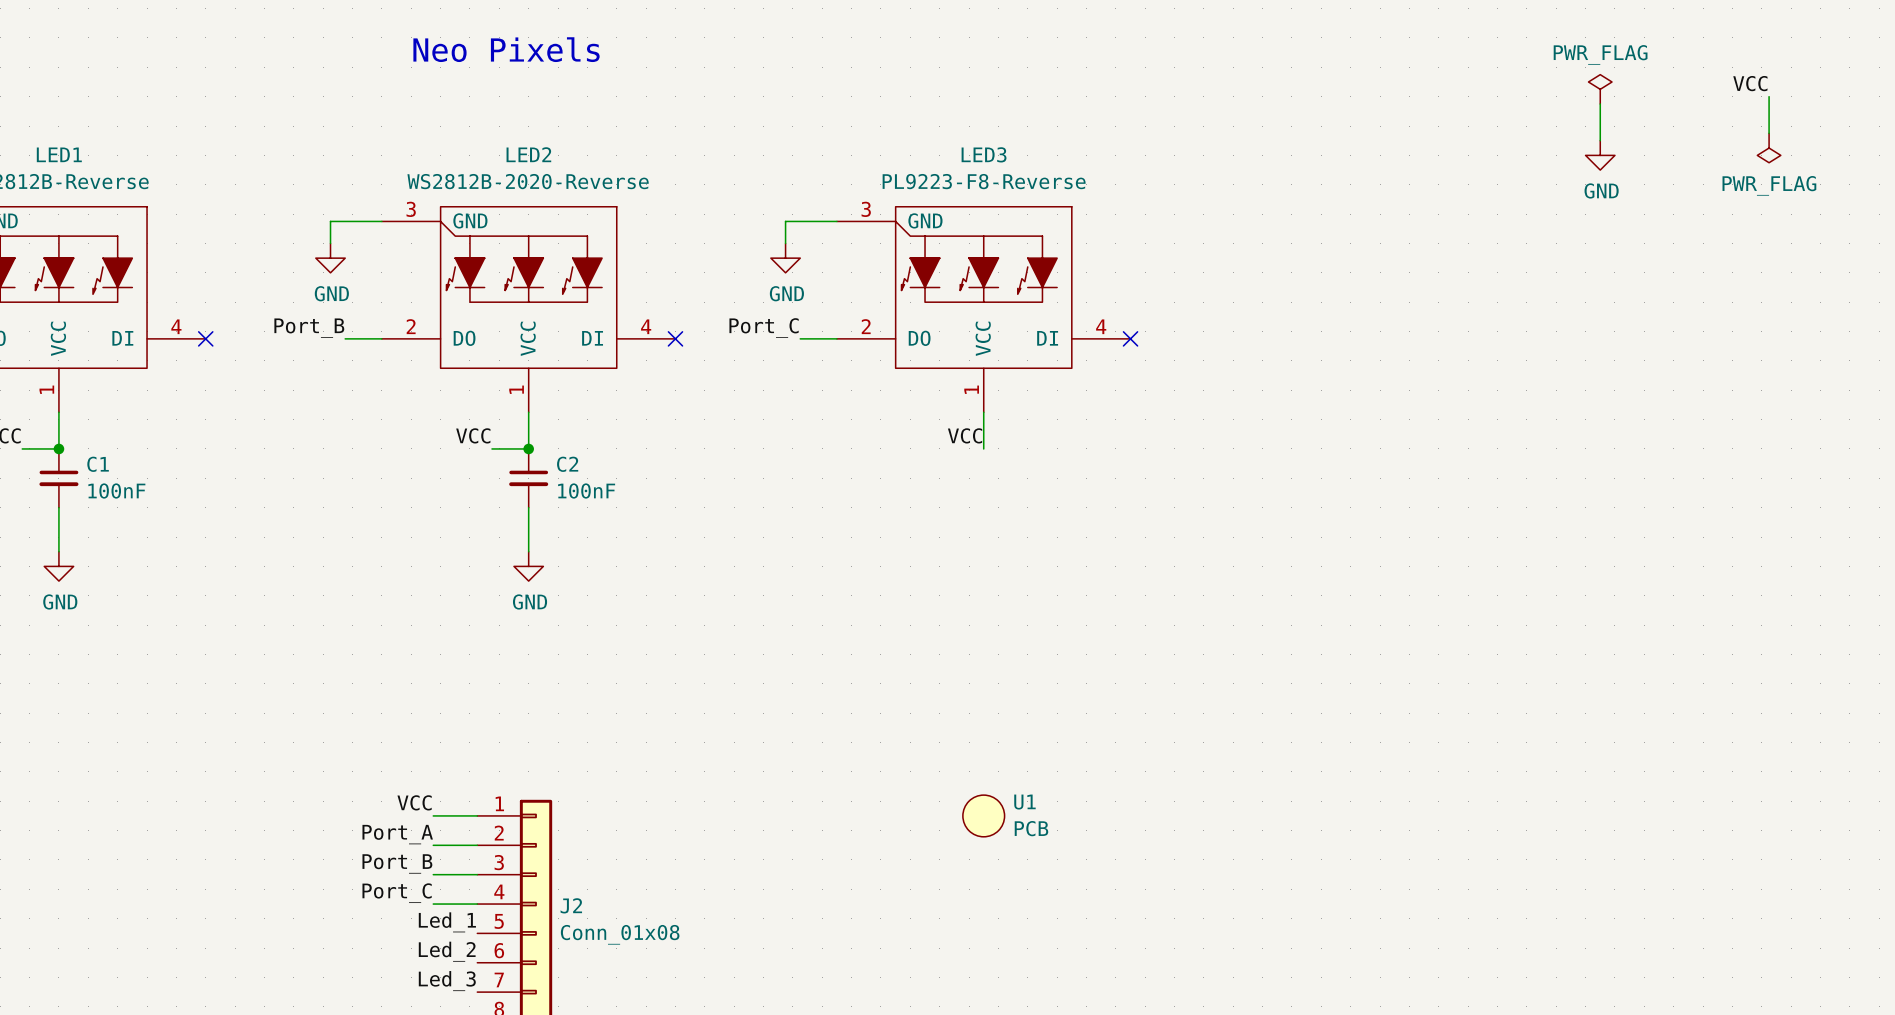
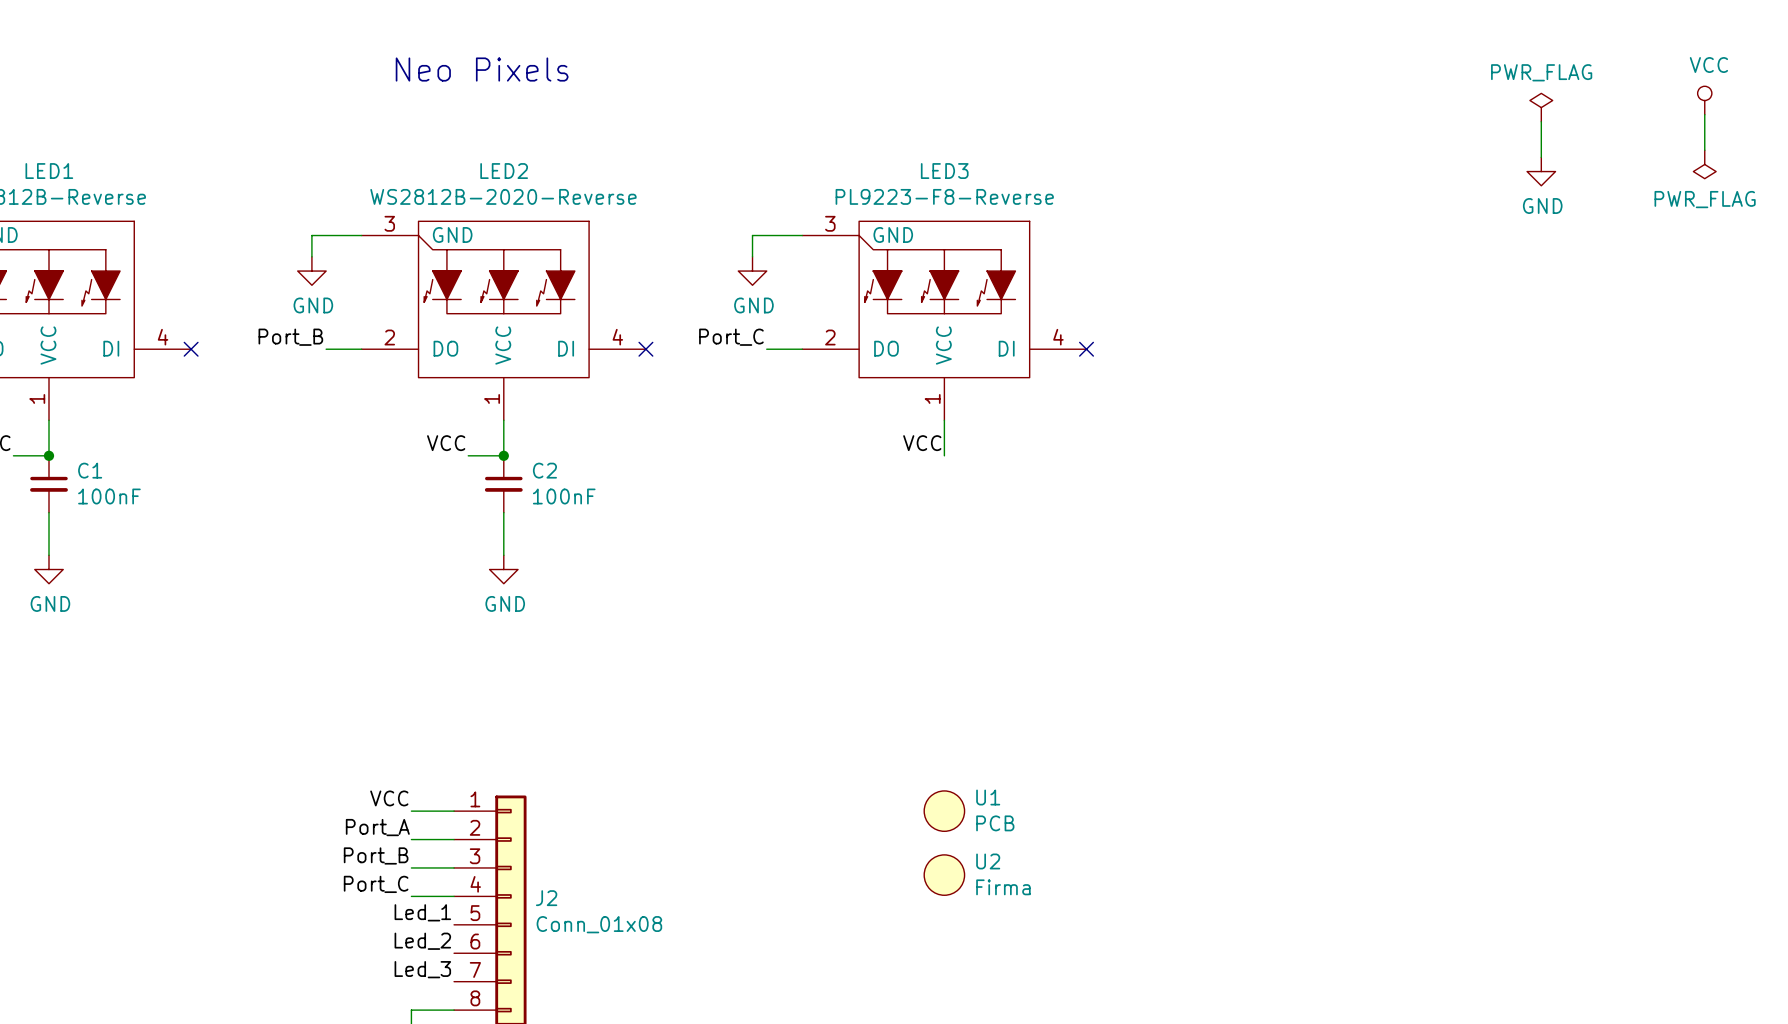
power symbol: none -> VCC (1704, 100)
label: VCC (1750, 83) -> none
U2: none -> Firma (944, 875)

